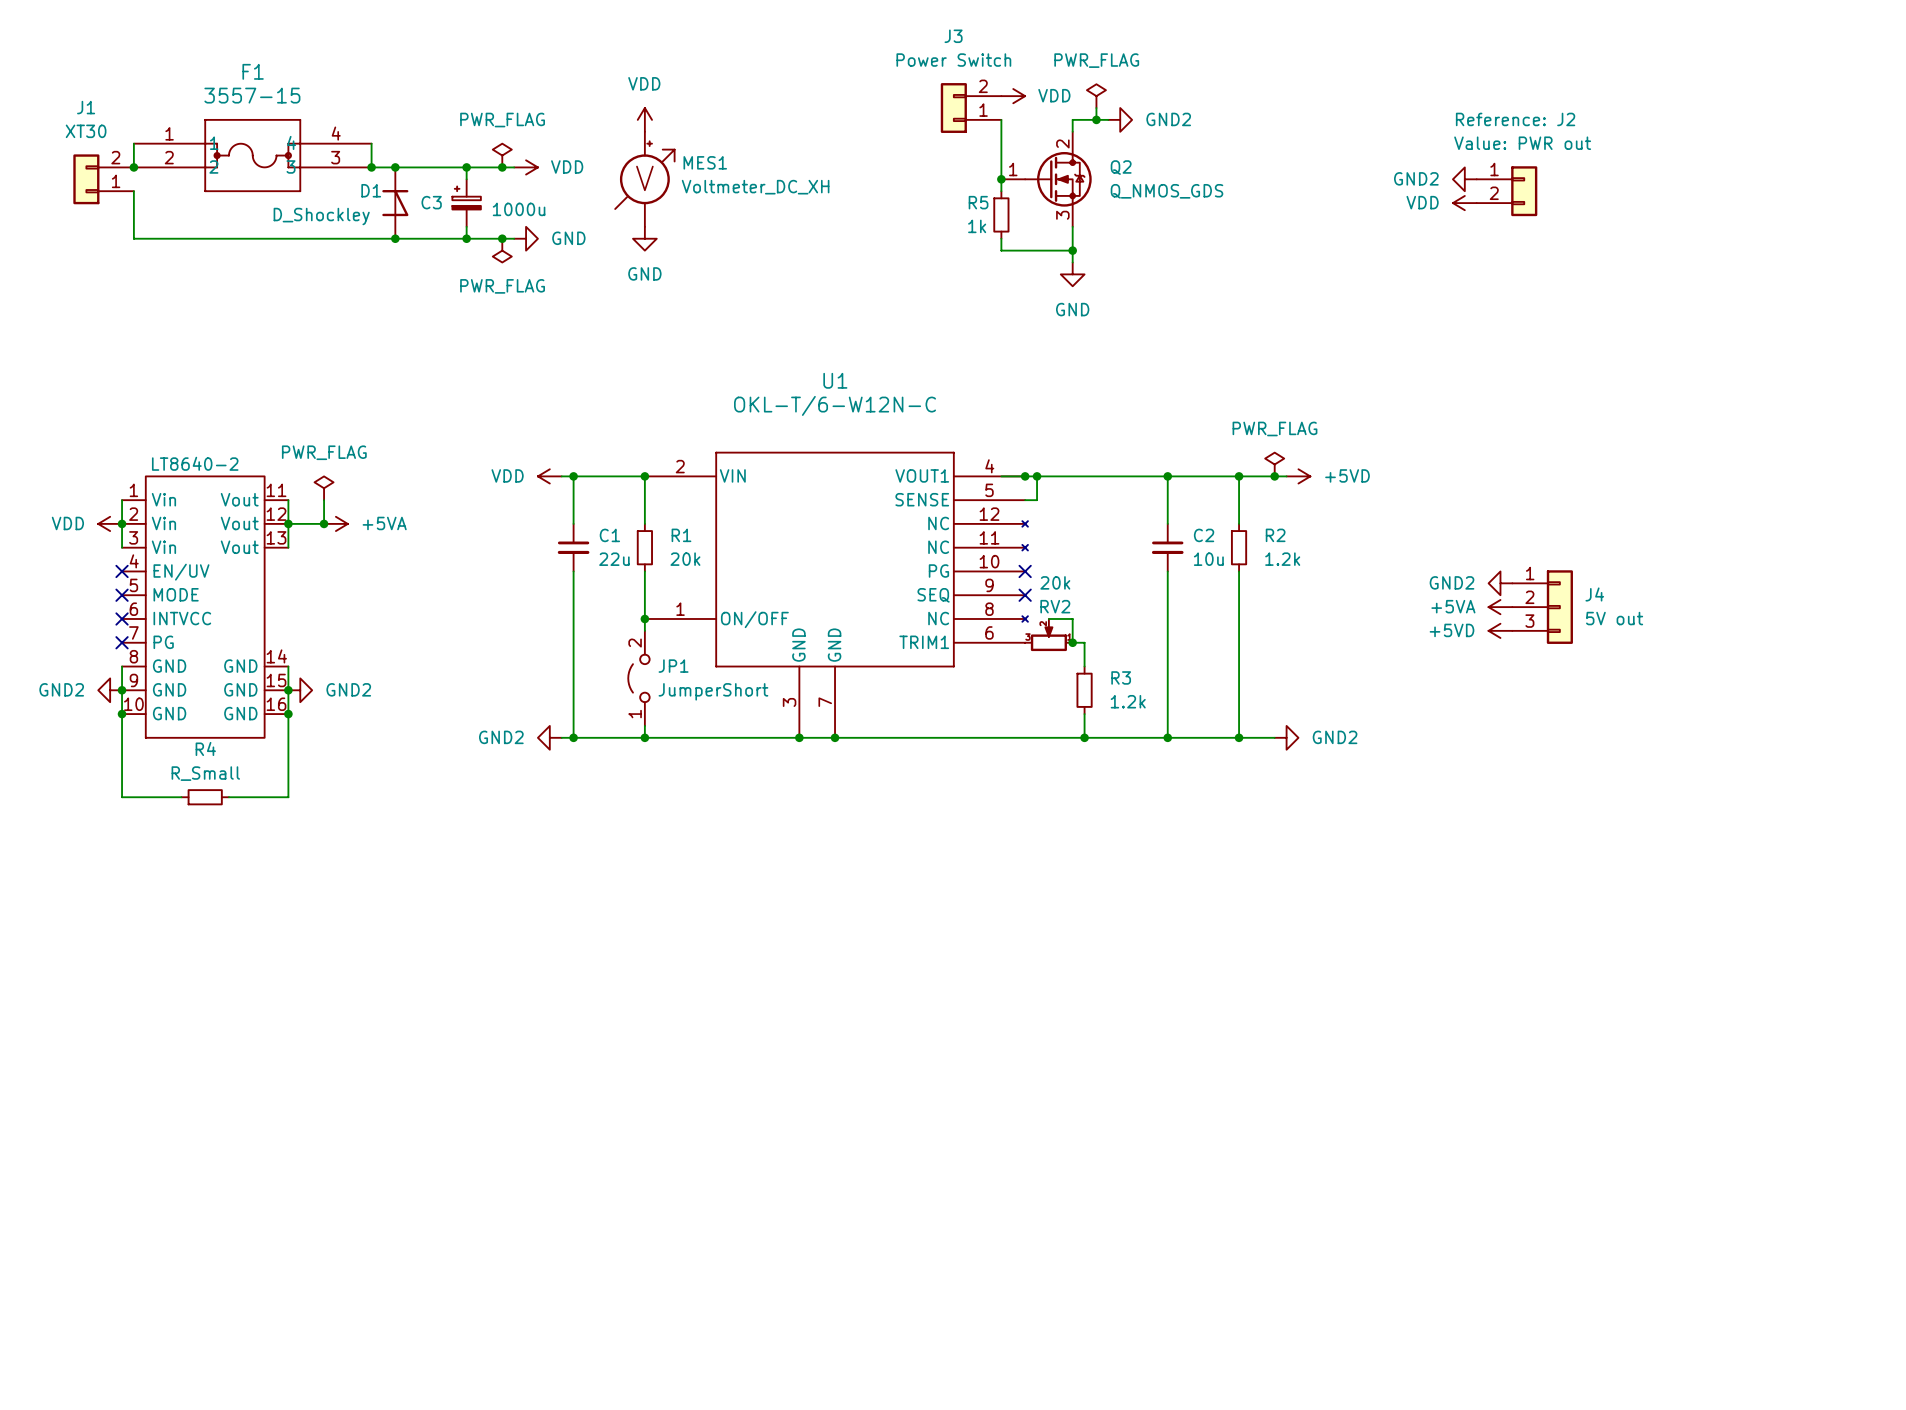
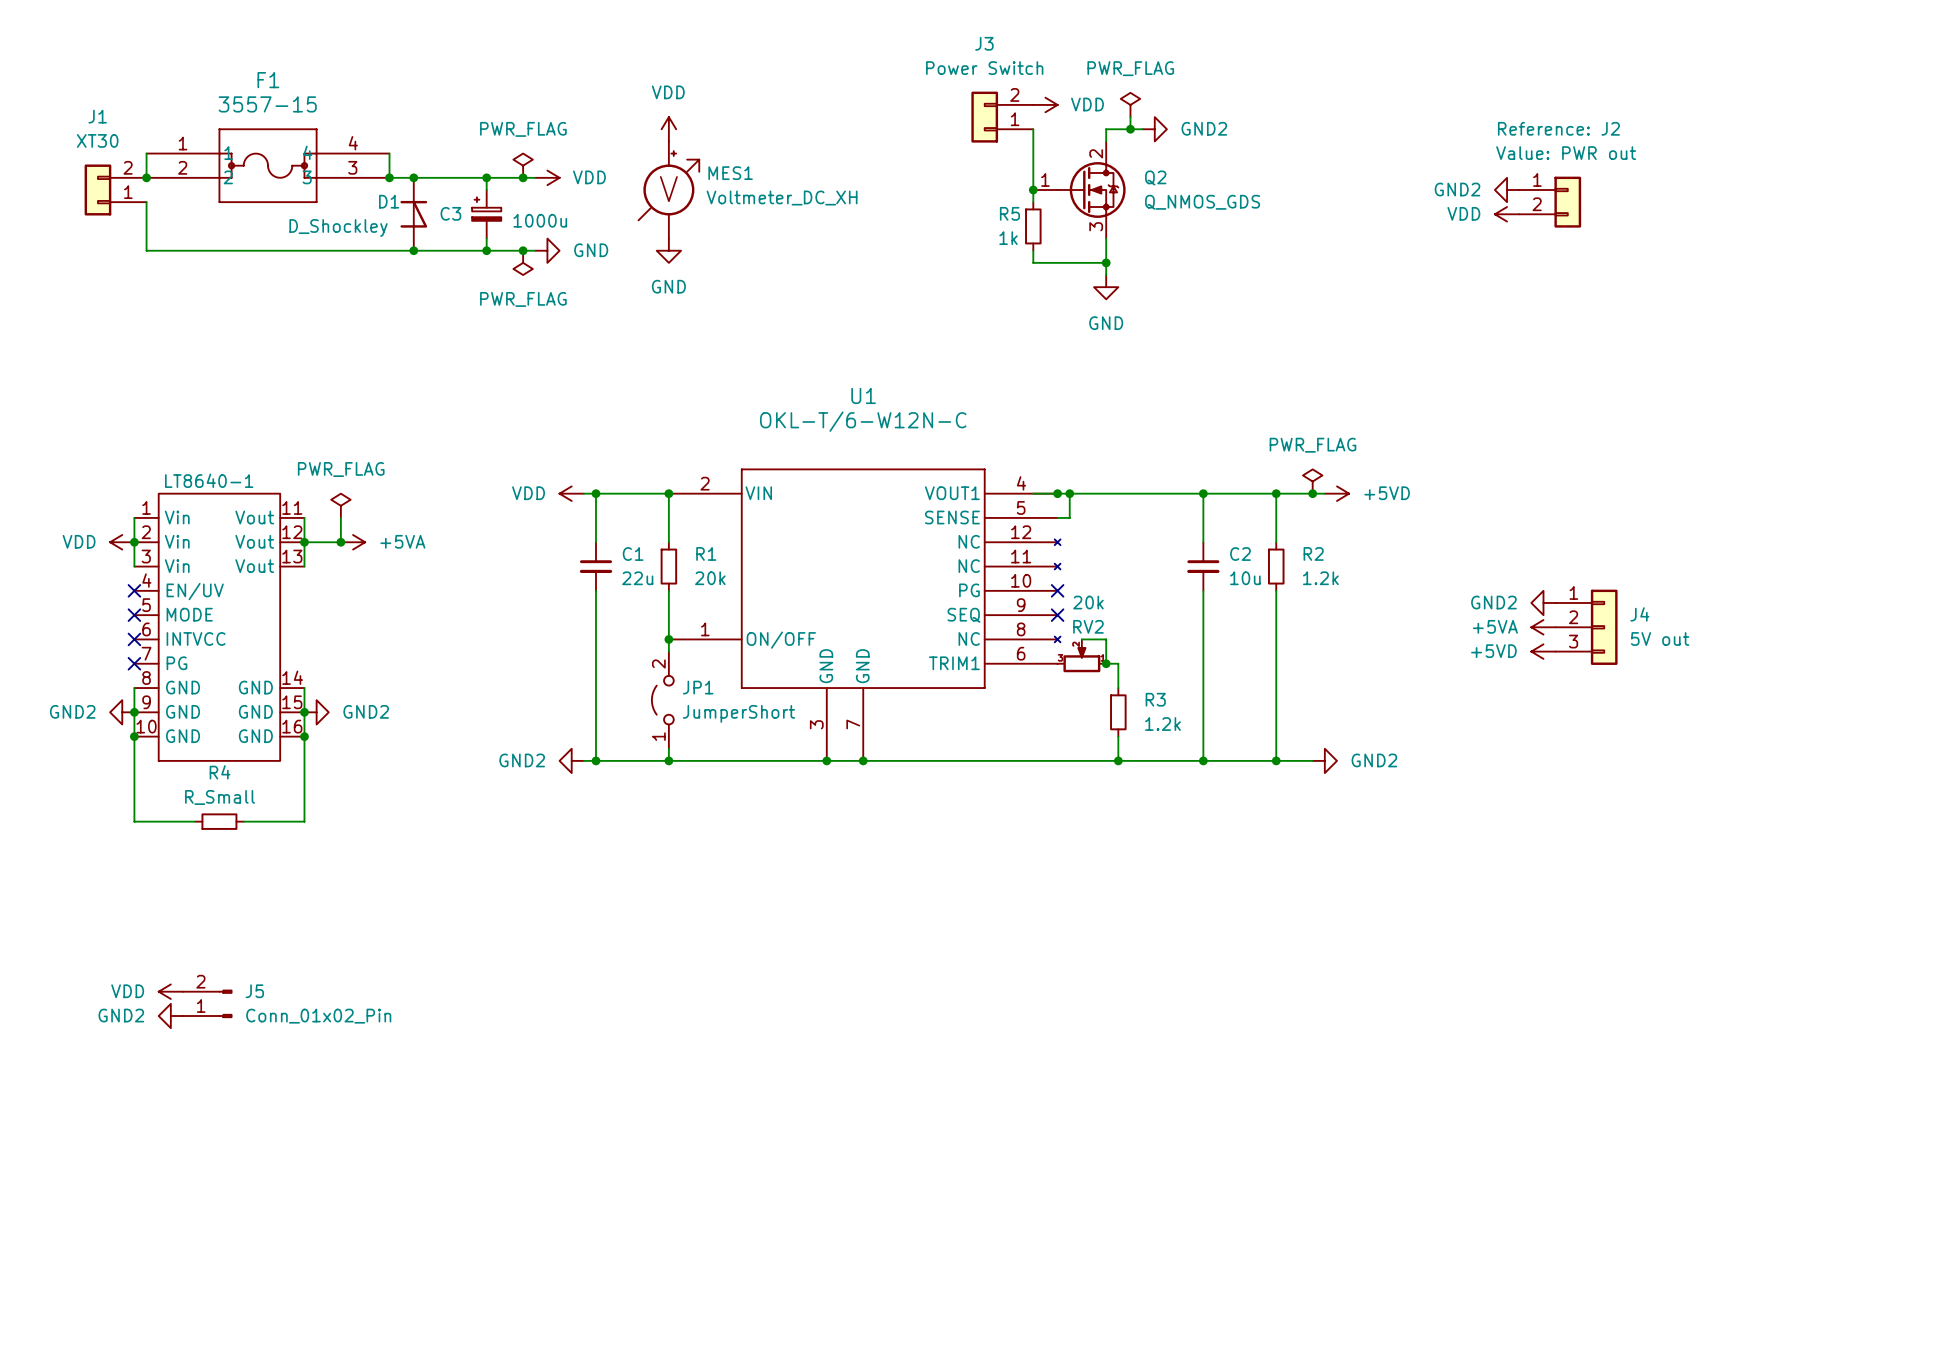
LT8640-2 name: LT8640-2 (195, 463) -> LT8640-1 (209, 480)
power symbol: none -> VDD (170, 991)
J5: none -> Conn_01x02_Pin (207, 1003)
power symbol: none -> GND2 (170, 1016)

